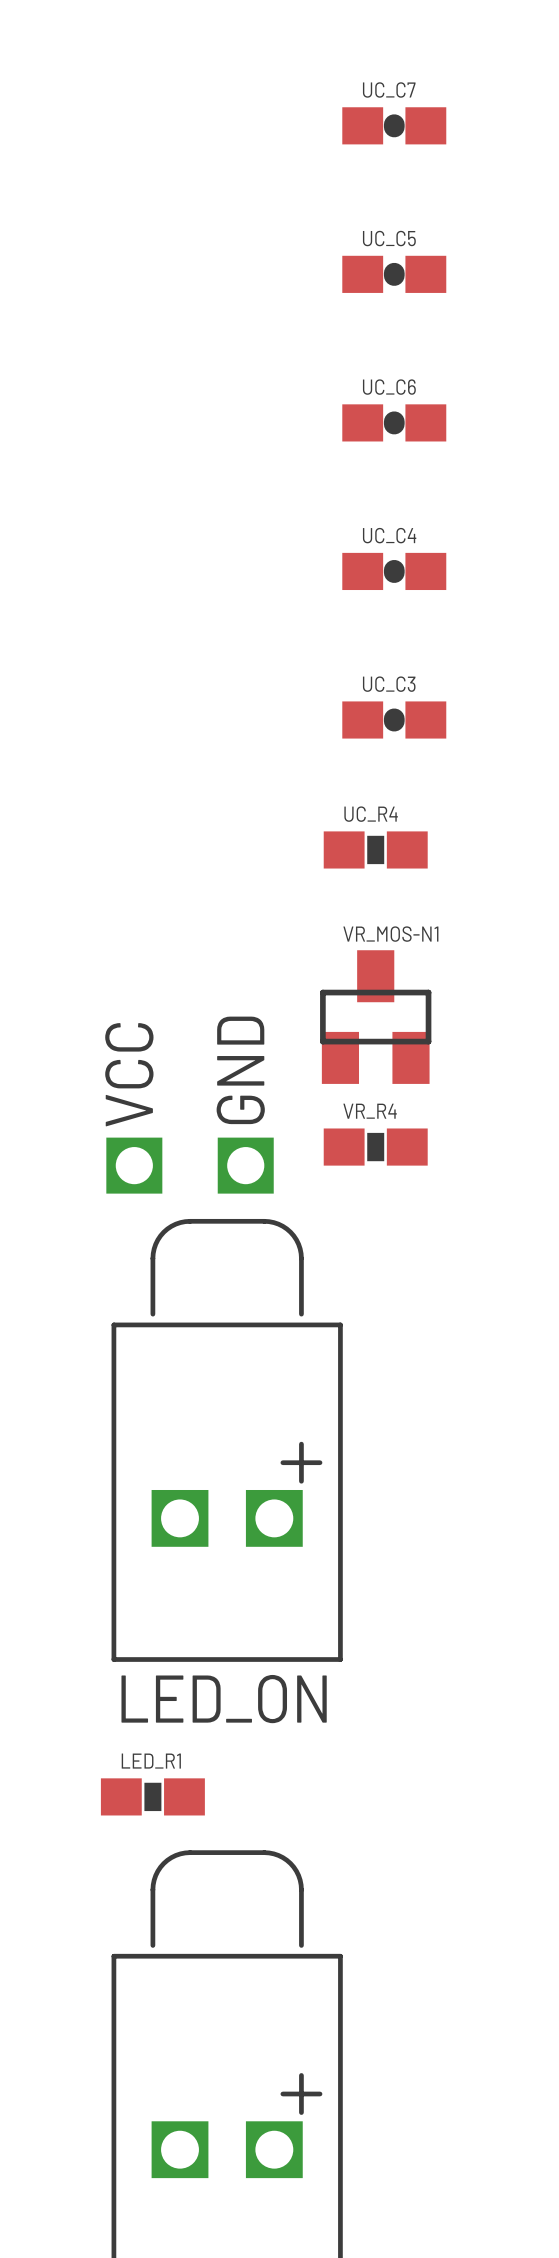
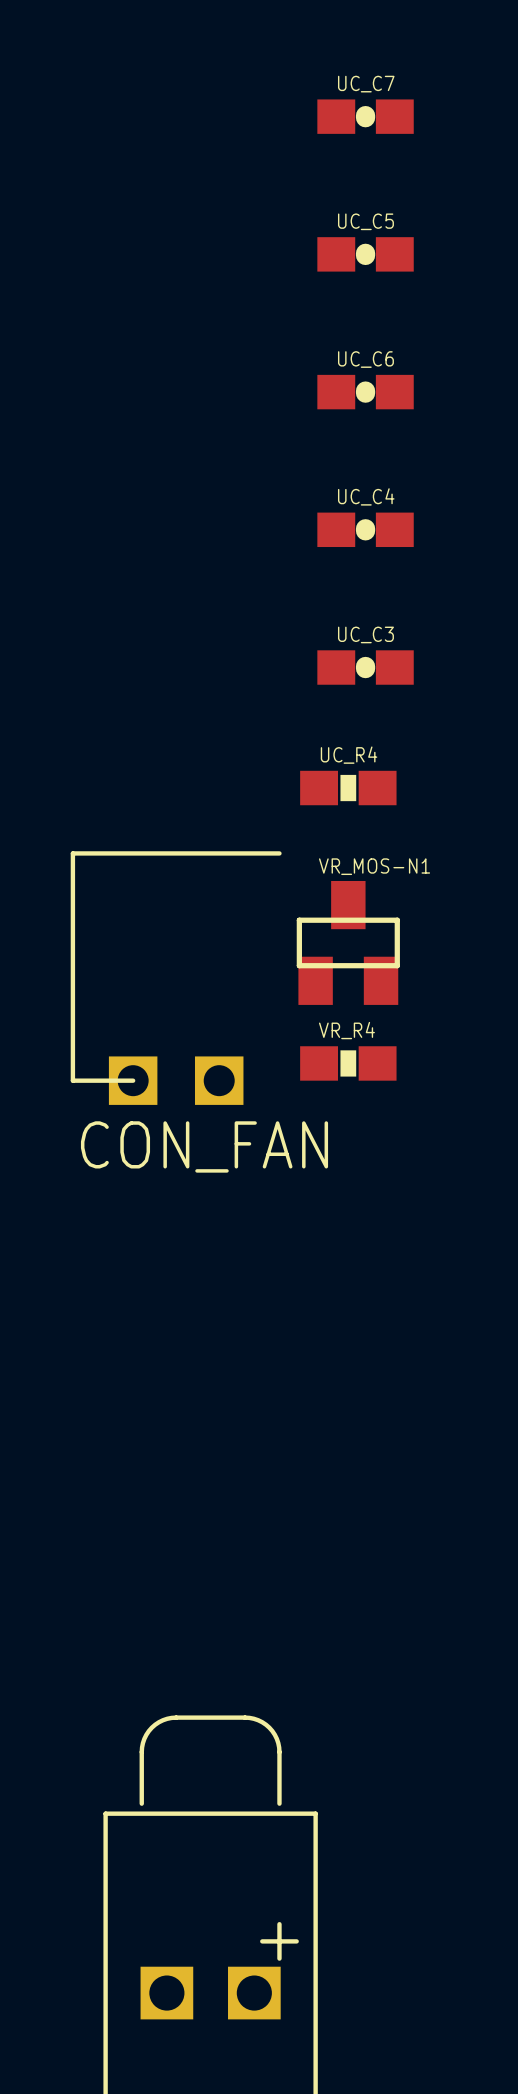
CON_FAN: none -> (176, 978)
part: (190, 1165) -> none
LED_ON: (227, 1440) -> none
LED_R1: (152, 1796) -> none

